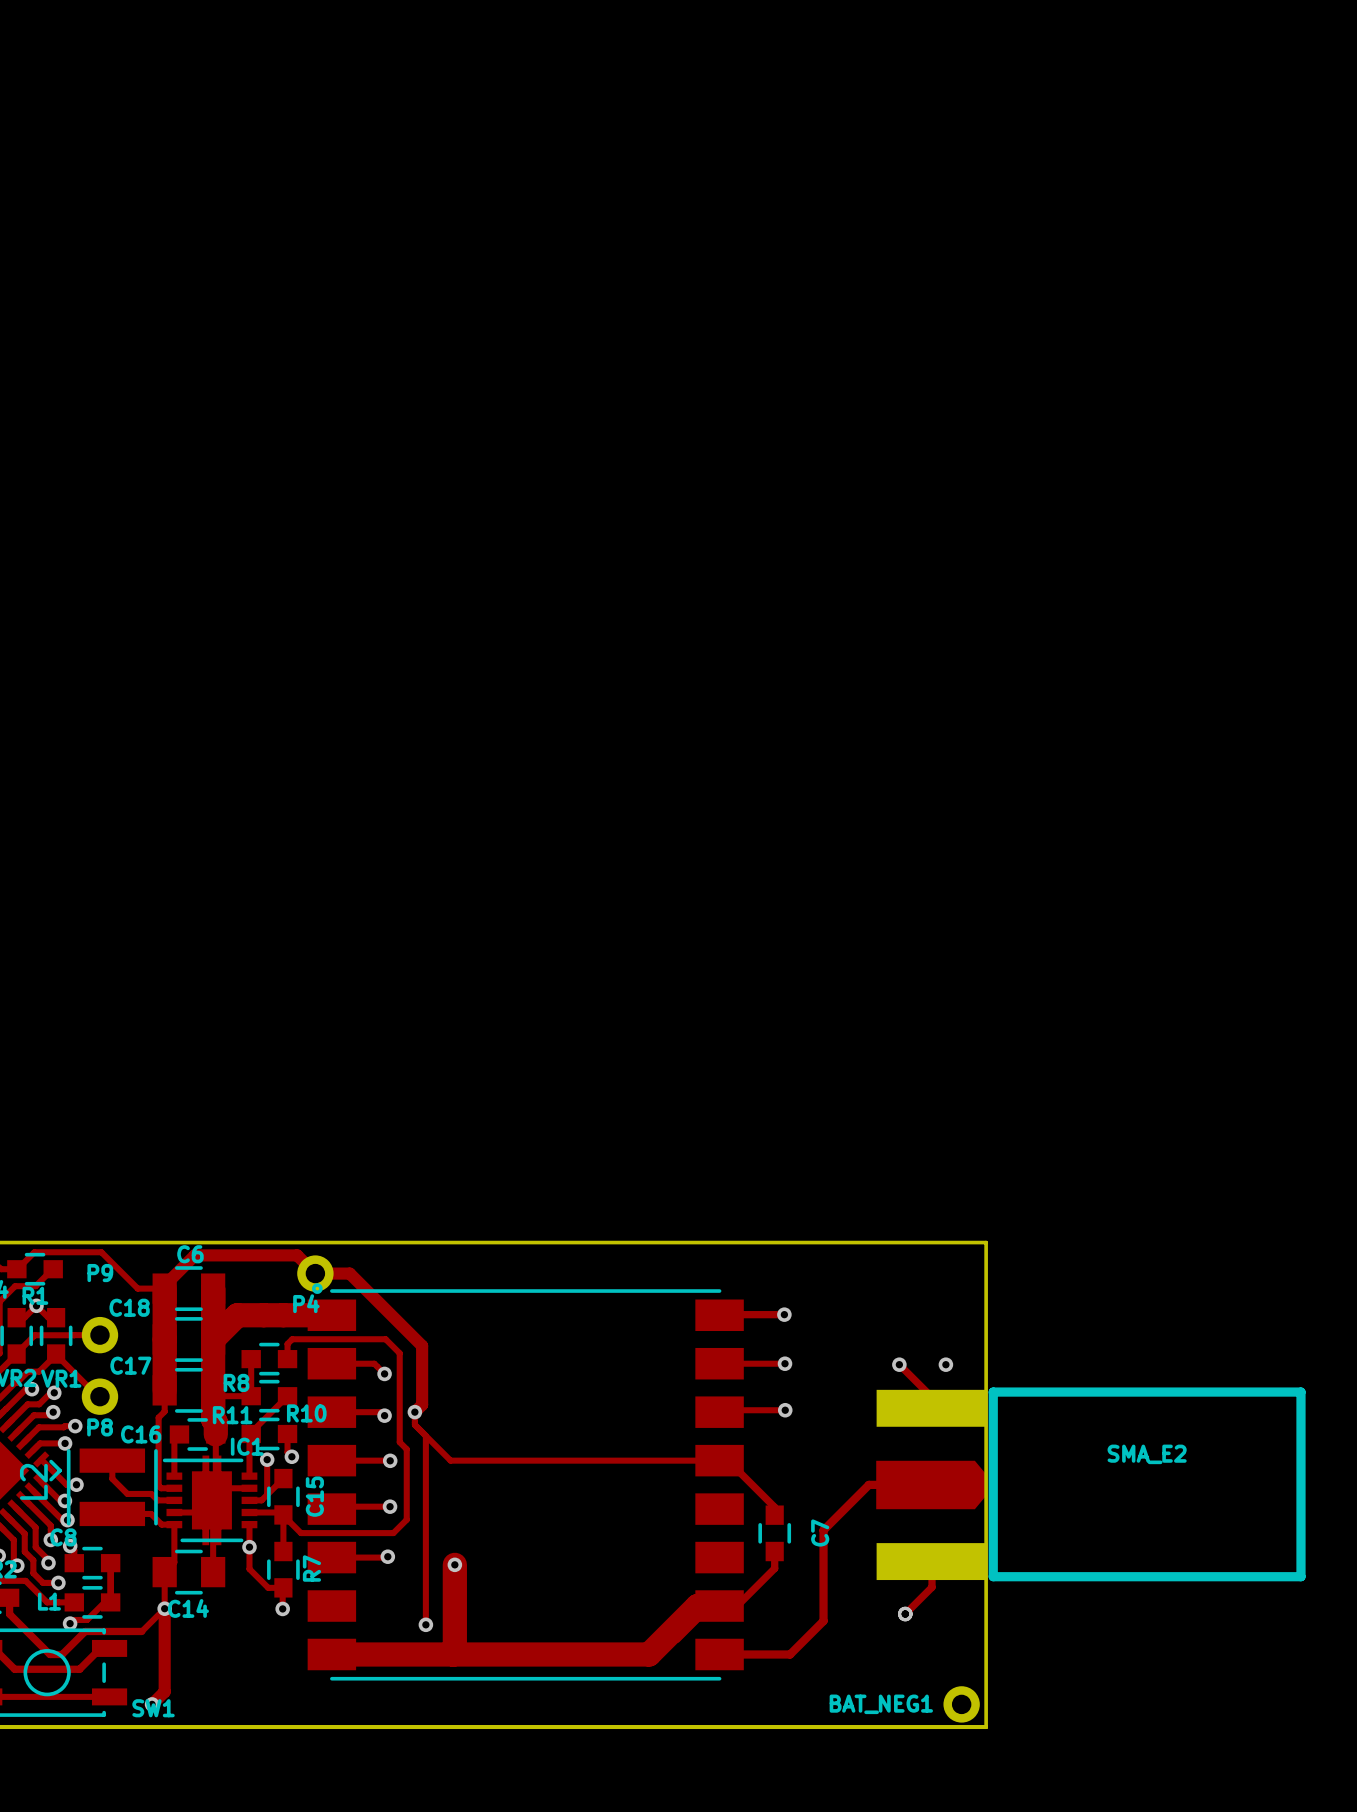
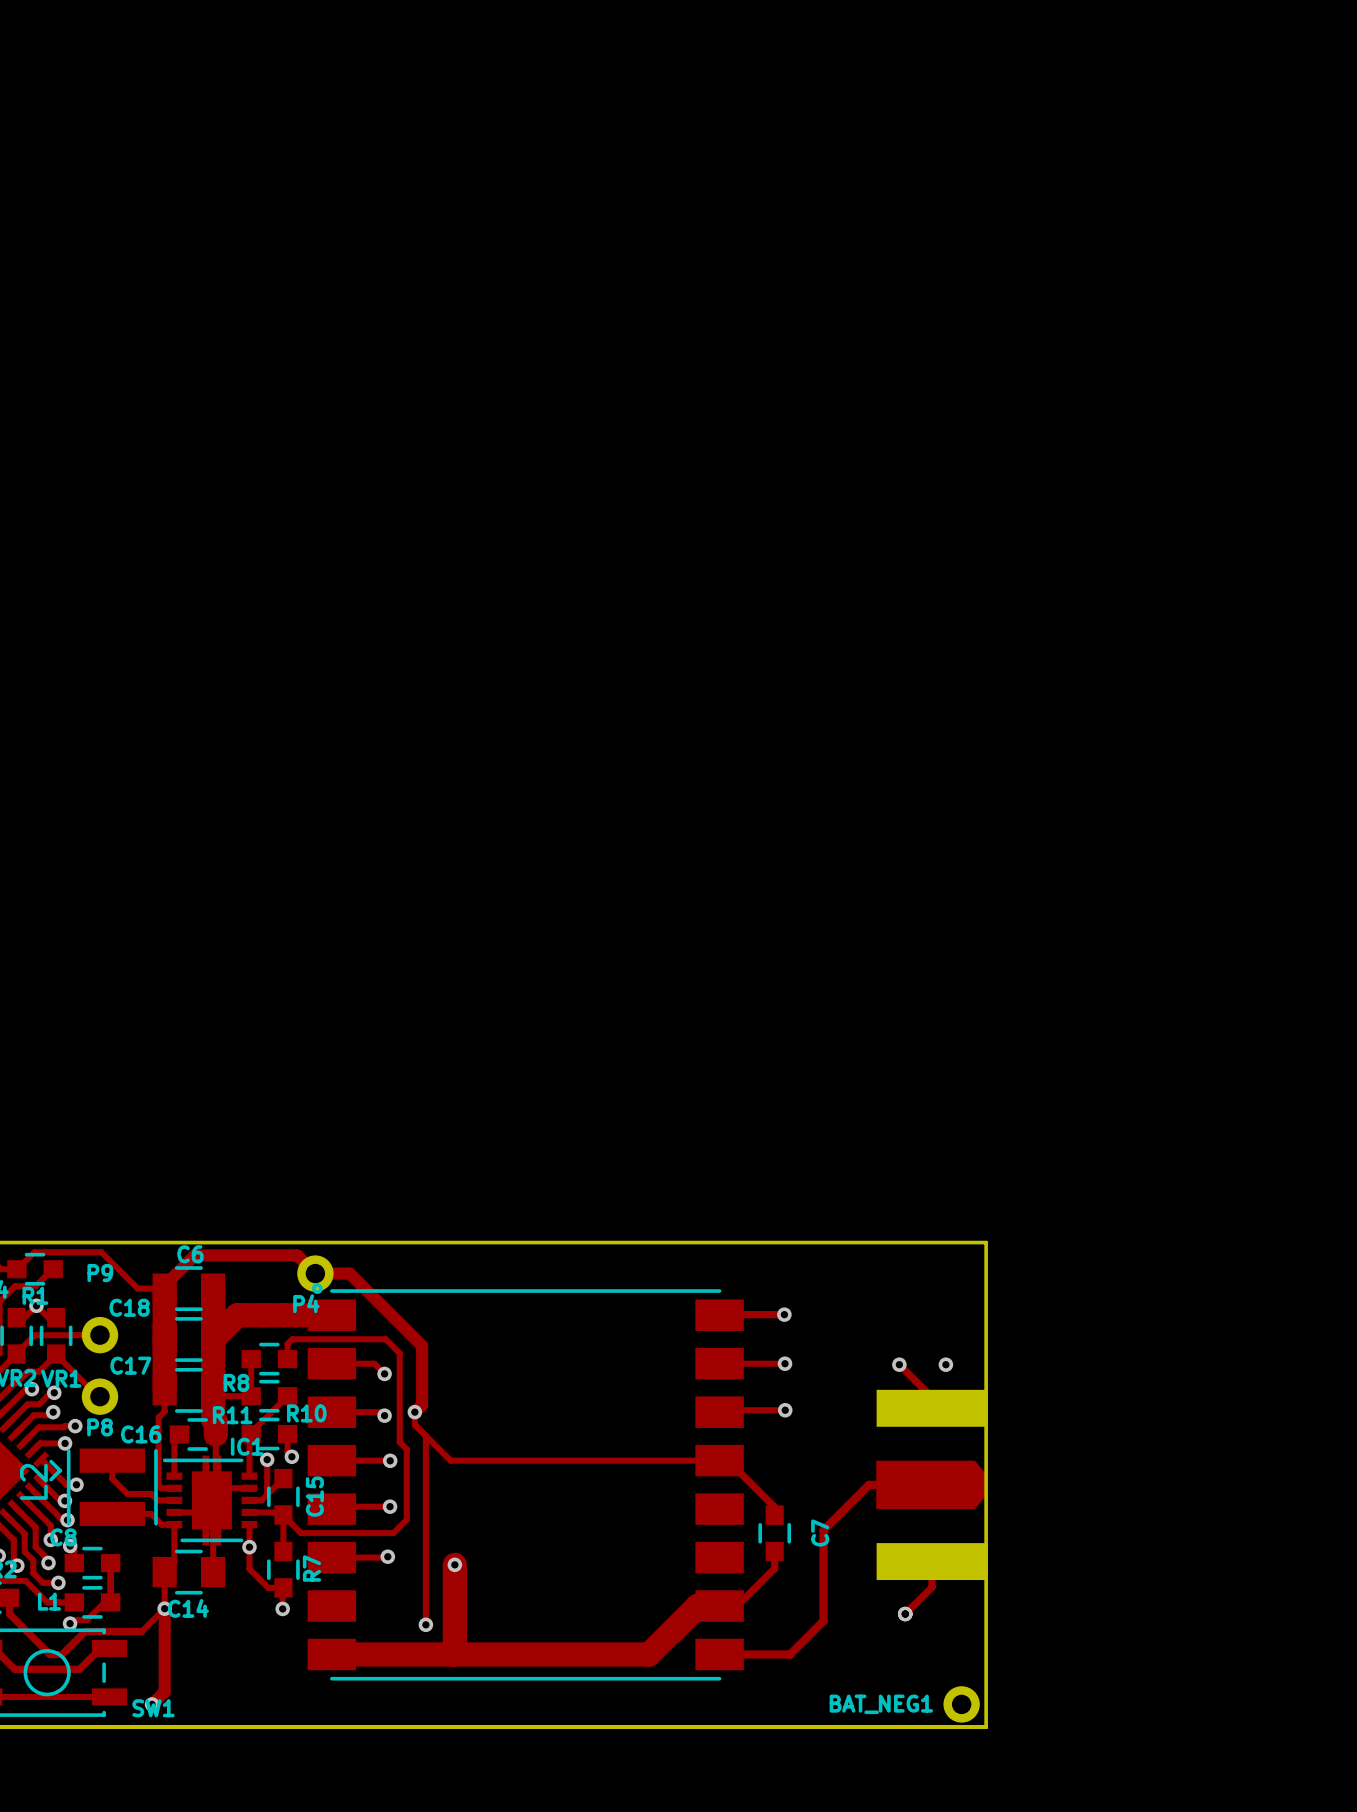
SMA_E2 side: top (1090, 1484) -> bottom (931, 1484)

